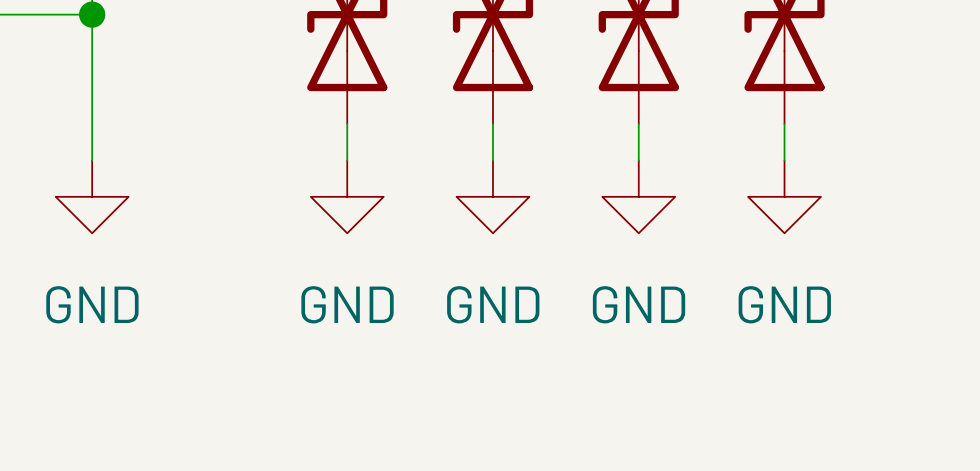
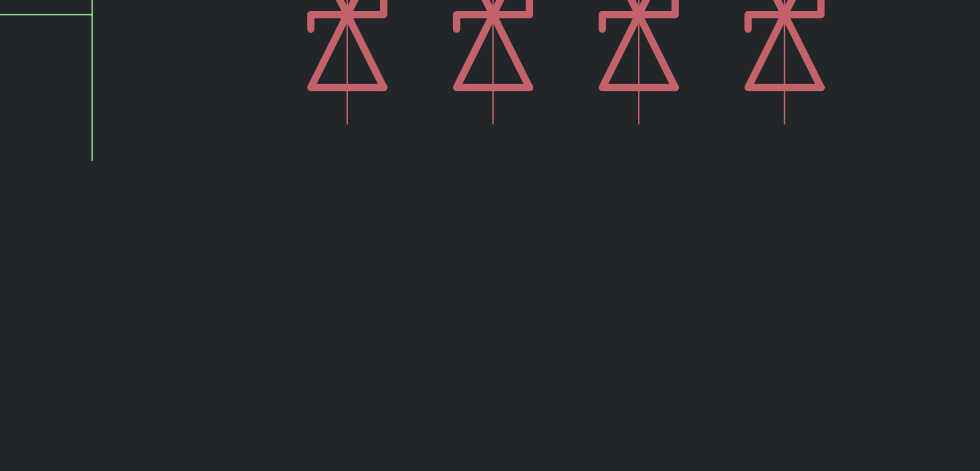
junction: (92, 14) -> none
wire: (347, 123) (347, 160) -> none
wire: (493, 123) (493, 160) -> none
wire: (638, 123) (638, 160) -> none
wire: (784, 123) (784, 160) -> none
power symbol: GND (92, 196) -> none
power symbol: GND (347, 196) -> none
power symbol: GND (493, 196) -> none
power symbol: GND (638, 196) -> none
power symbol: GND (784, 196) -> none

